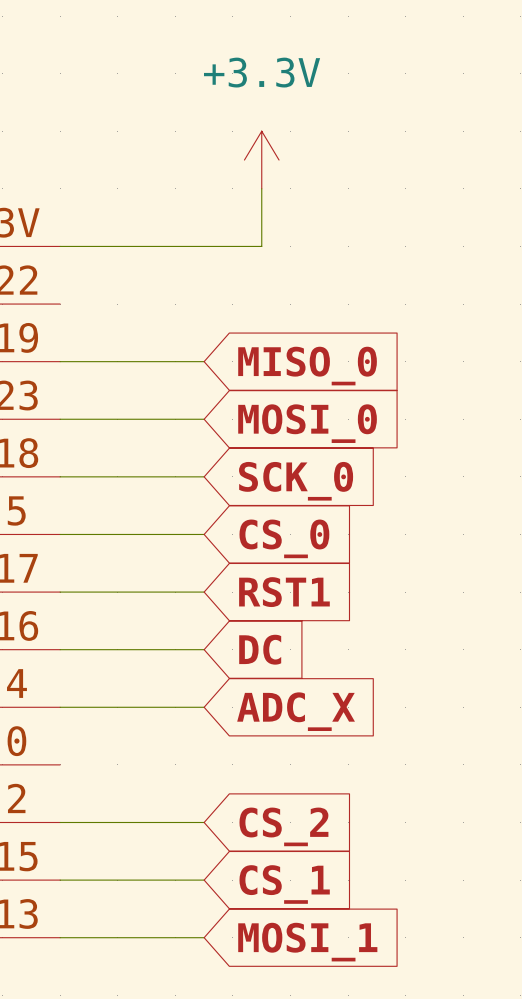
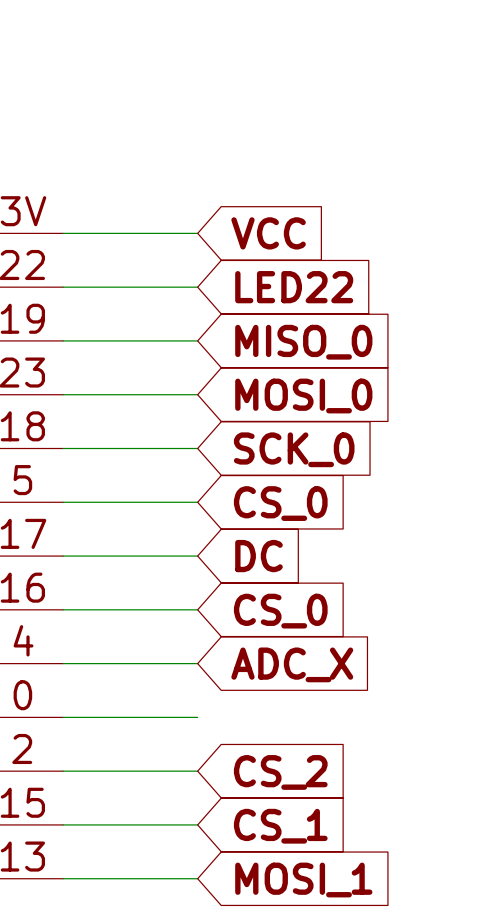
power symbol: +3.3V (261, 160) -> none
wire: (261, 188) (261, 246) (204, 246) -> none
global label: none -> VCC (268, 233)
global label: none -> LED22 (294, 287)
wire: none -> (63, 287) (197, 287)
global label: RST1 (284, 592) -> DC (258, 556)
global label: DC (260, 649) -> CS_0 (280, 611)
wire: none -> (63, 717) (197, 717)

